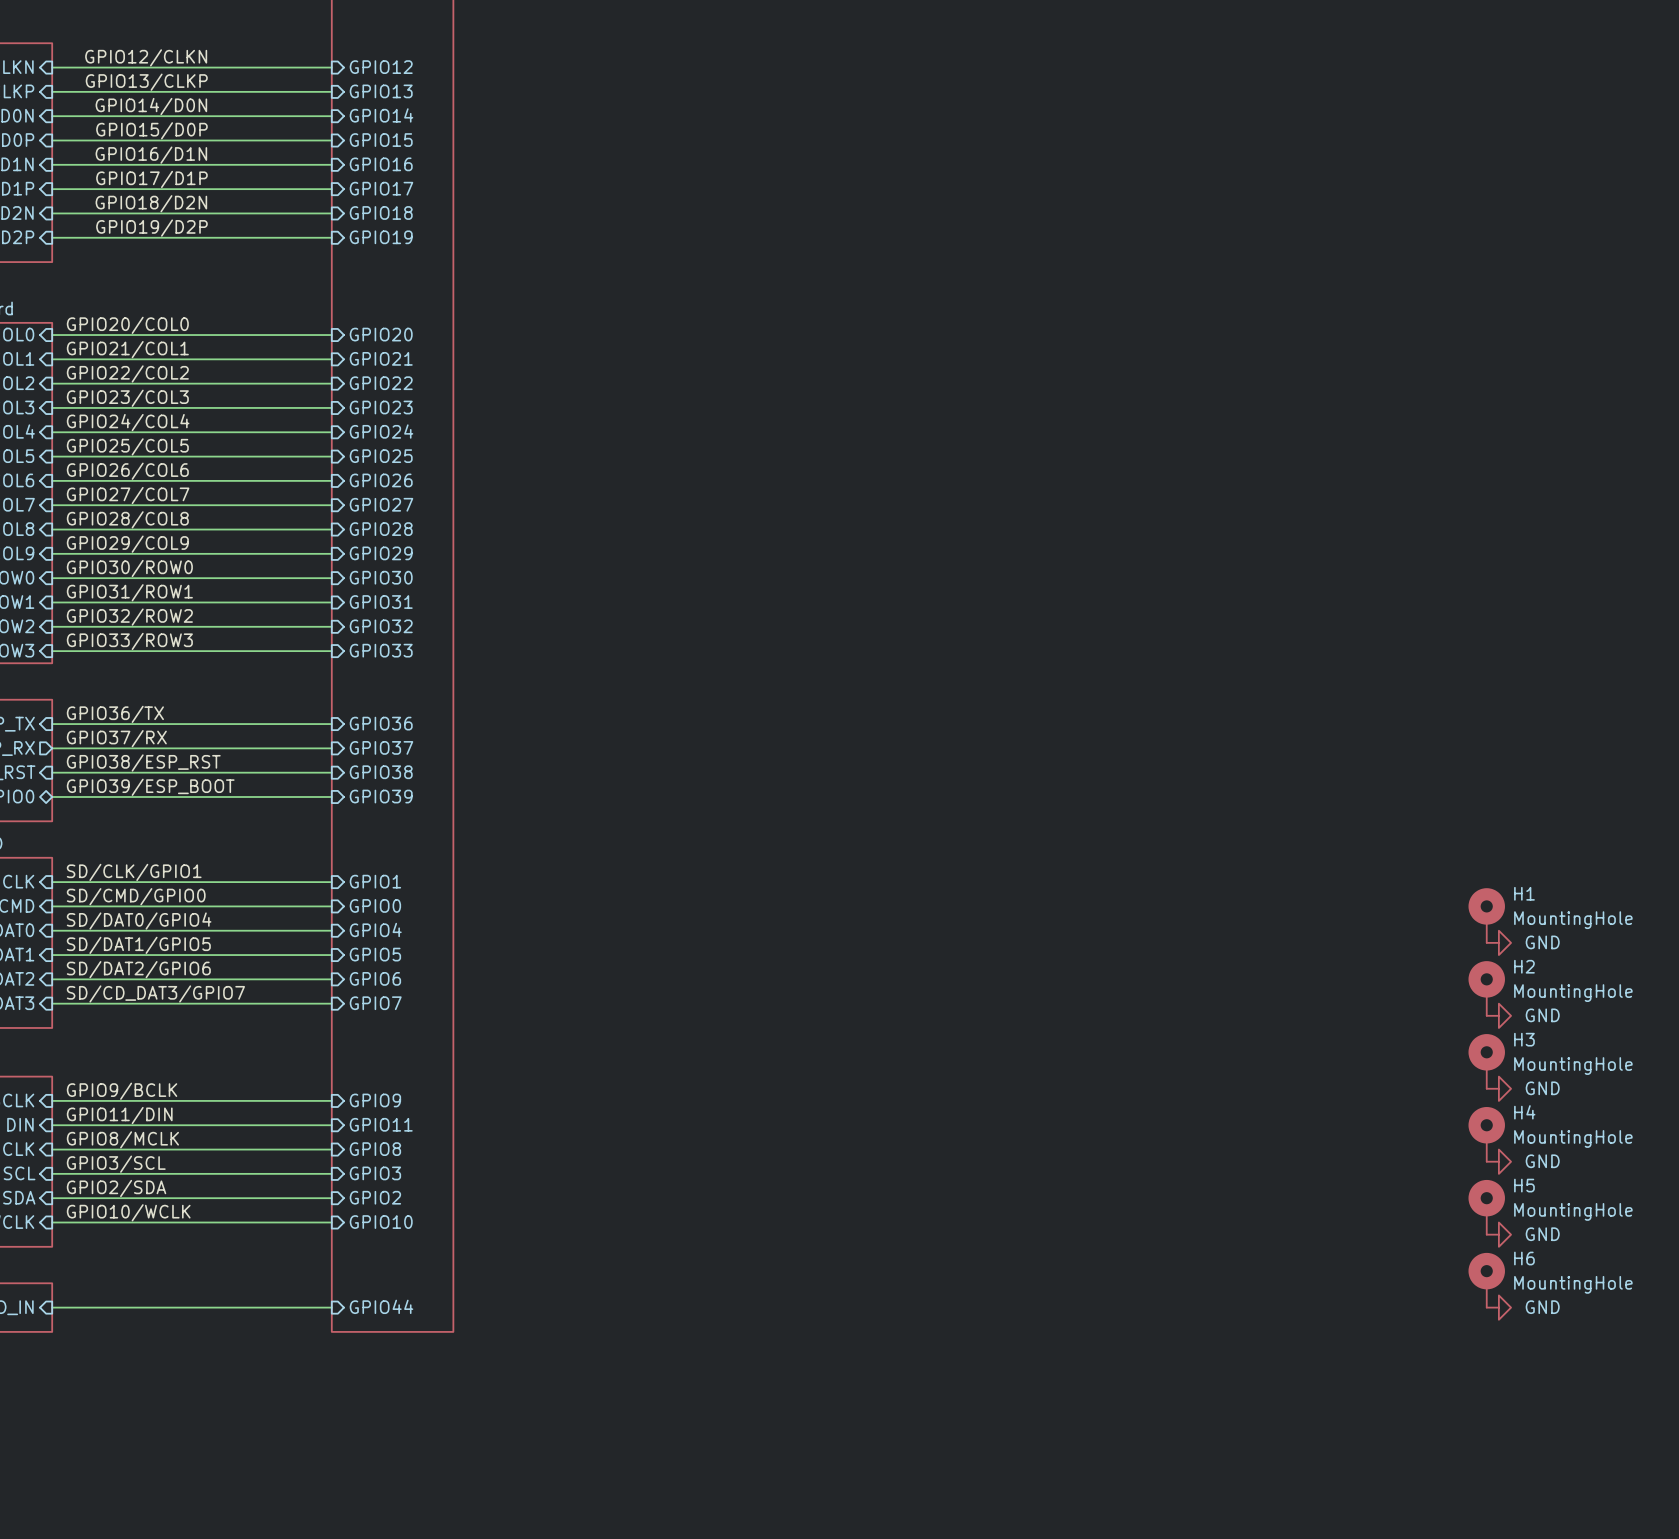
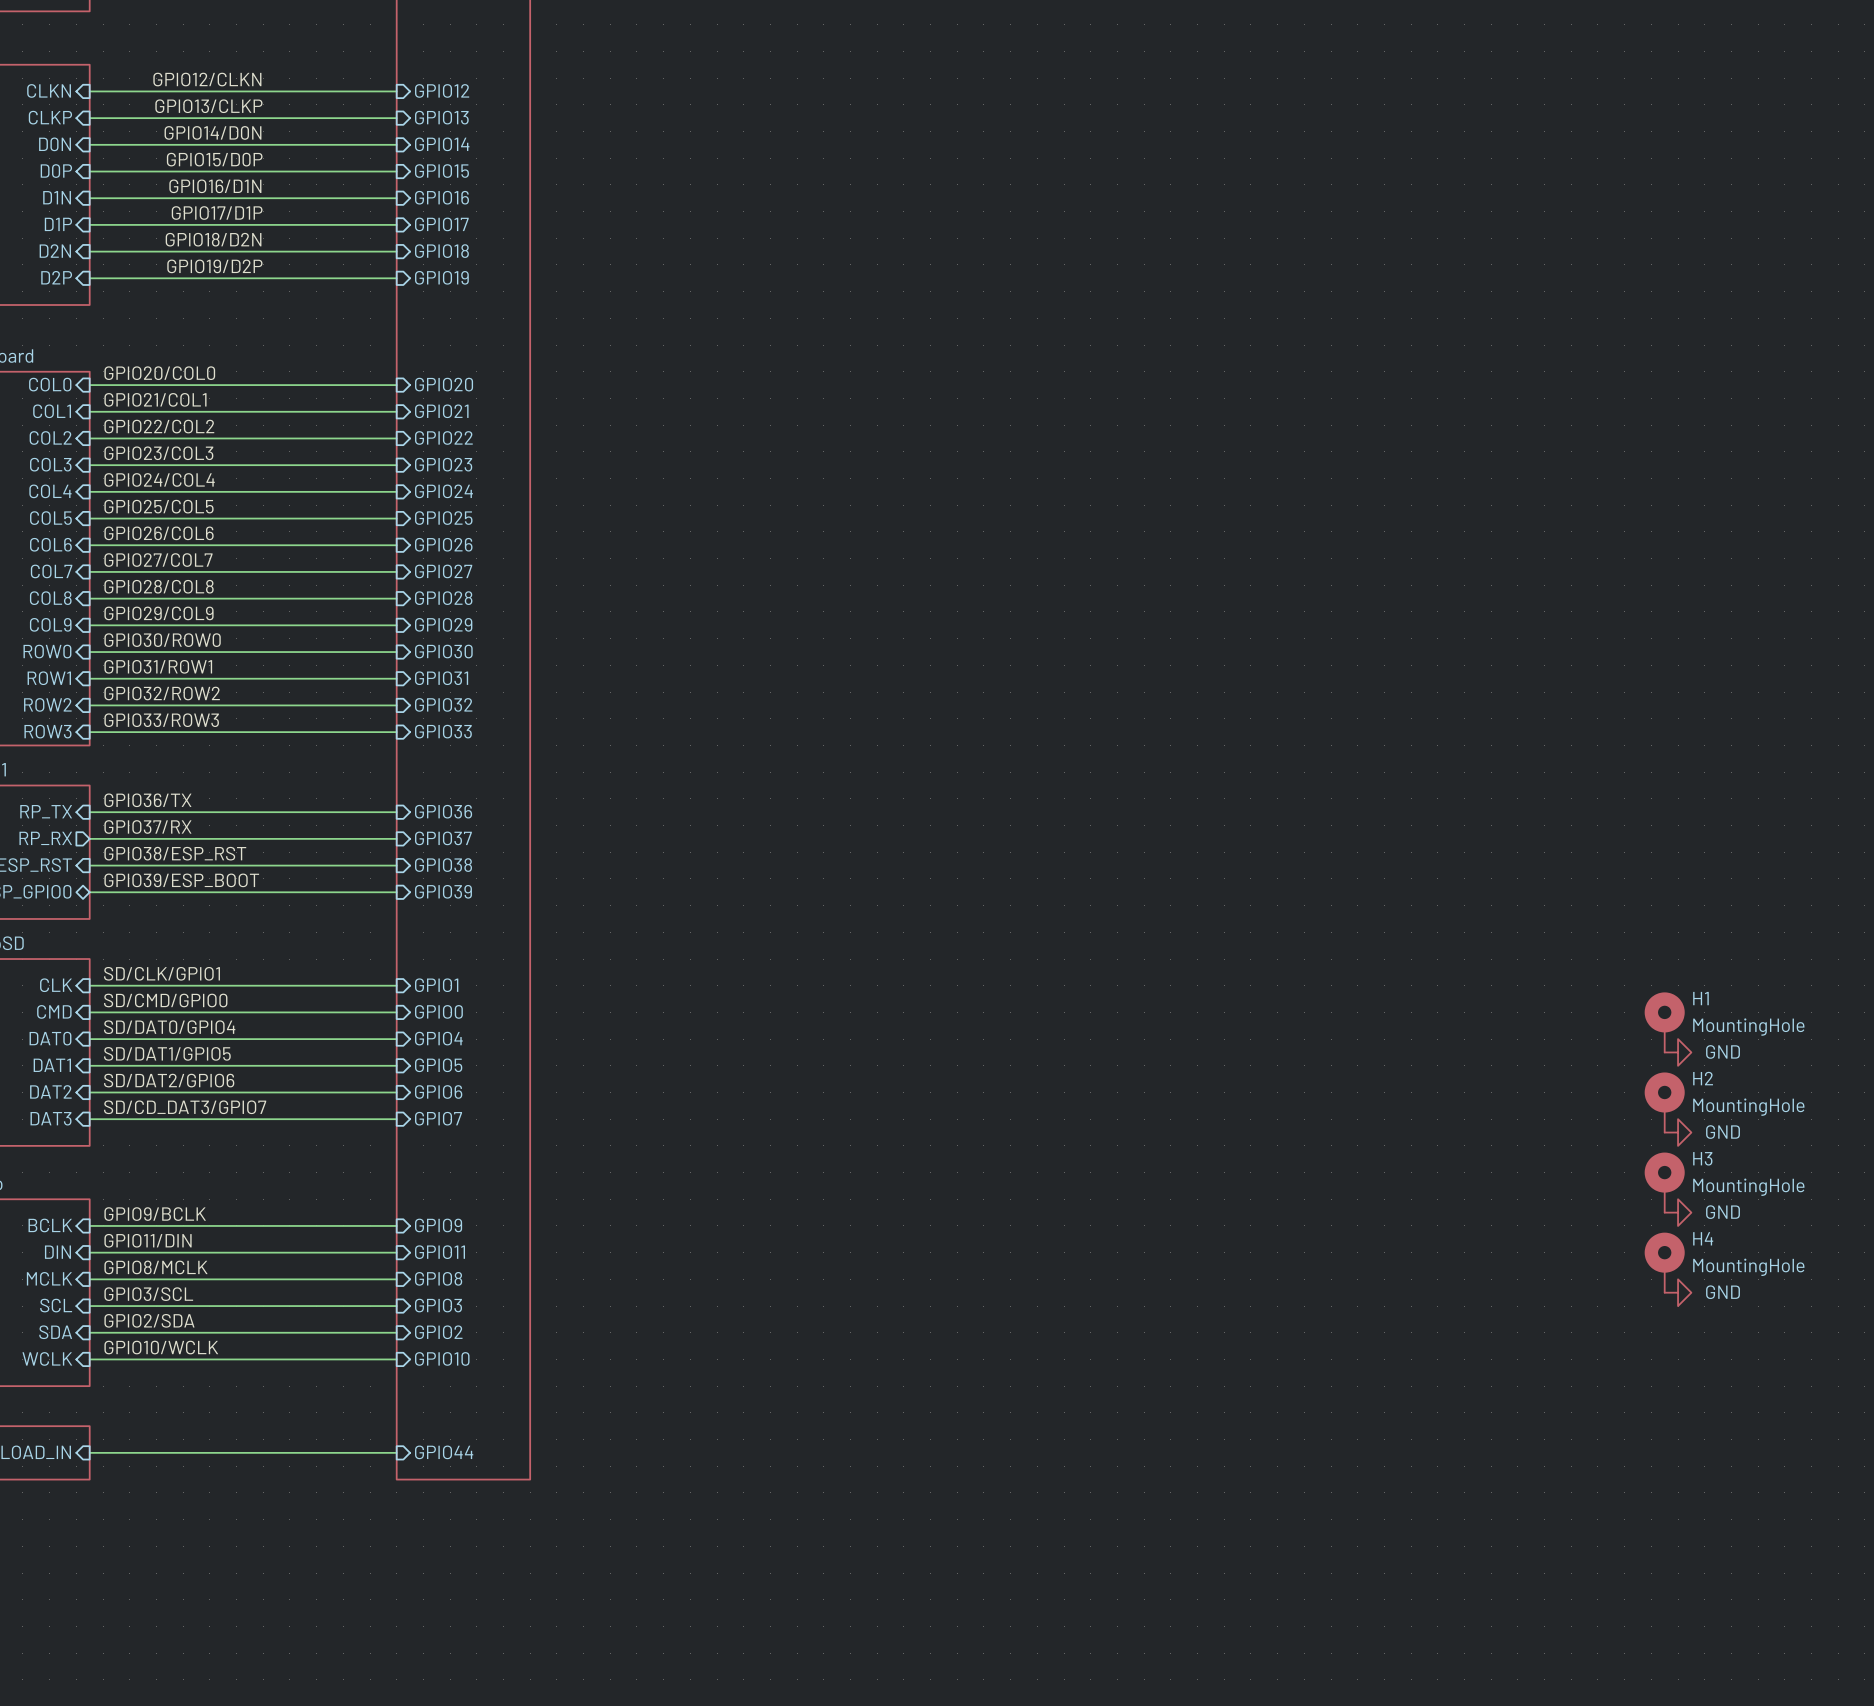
H5: MountingHole (1486, 1207) -> none
power symbol: GND (1498, 1234) -> none
H6: MountingHole (1486, 1280) -> none
power symbol: GND (1498, 1307) -> none

